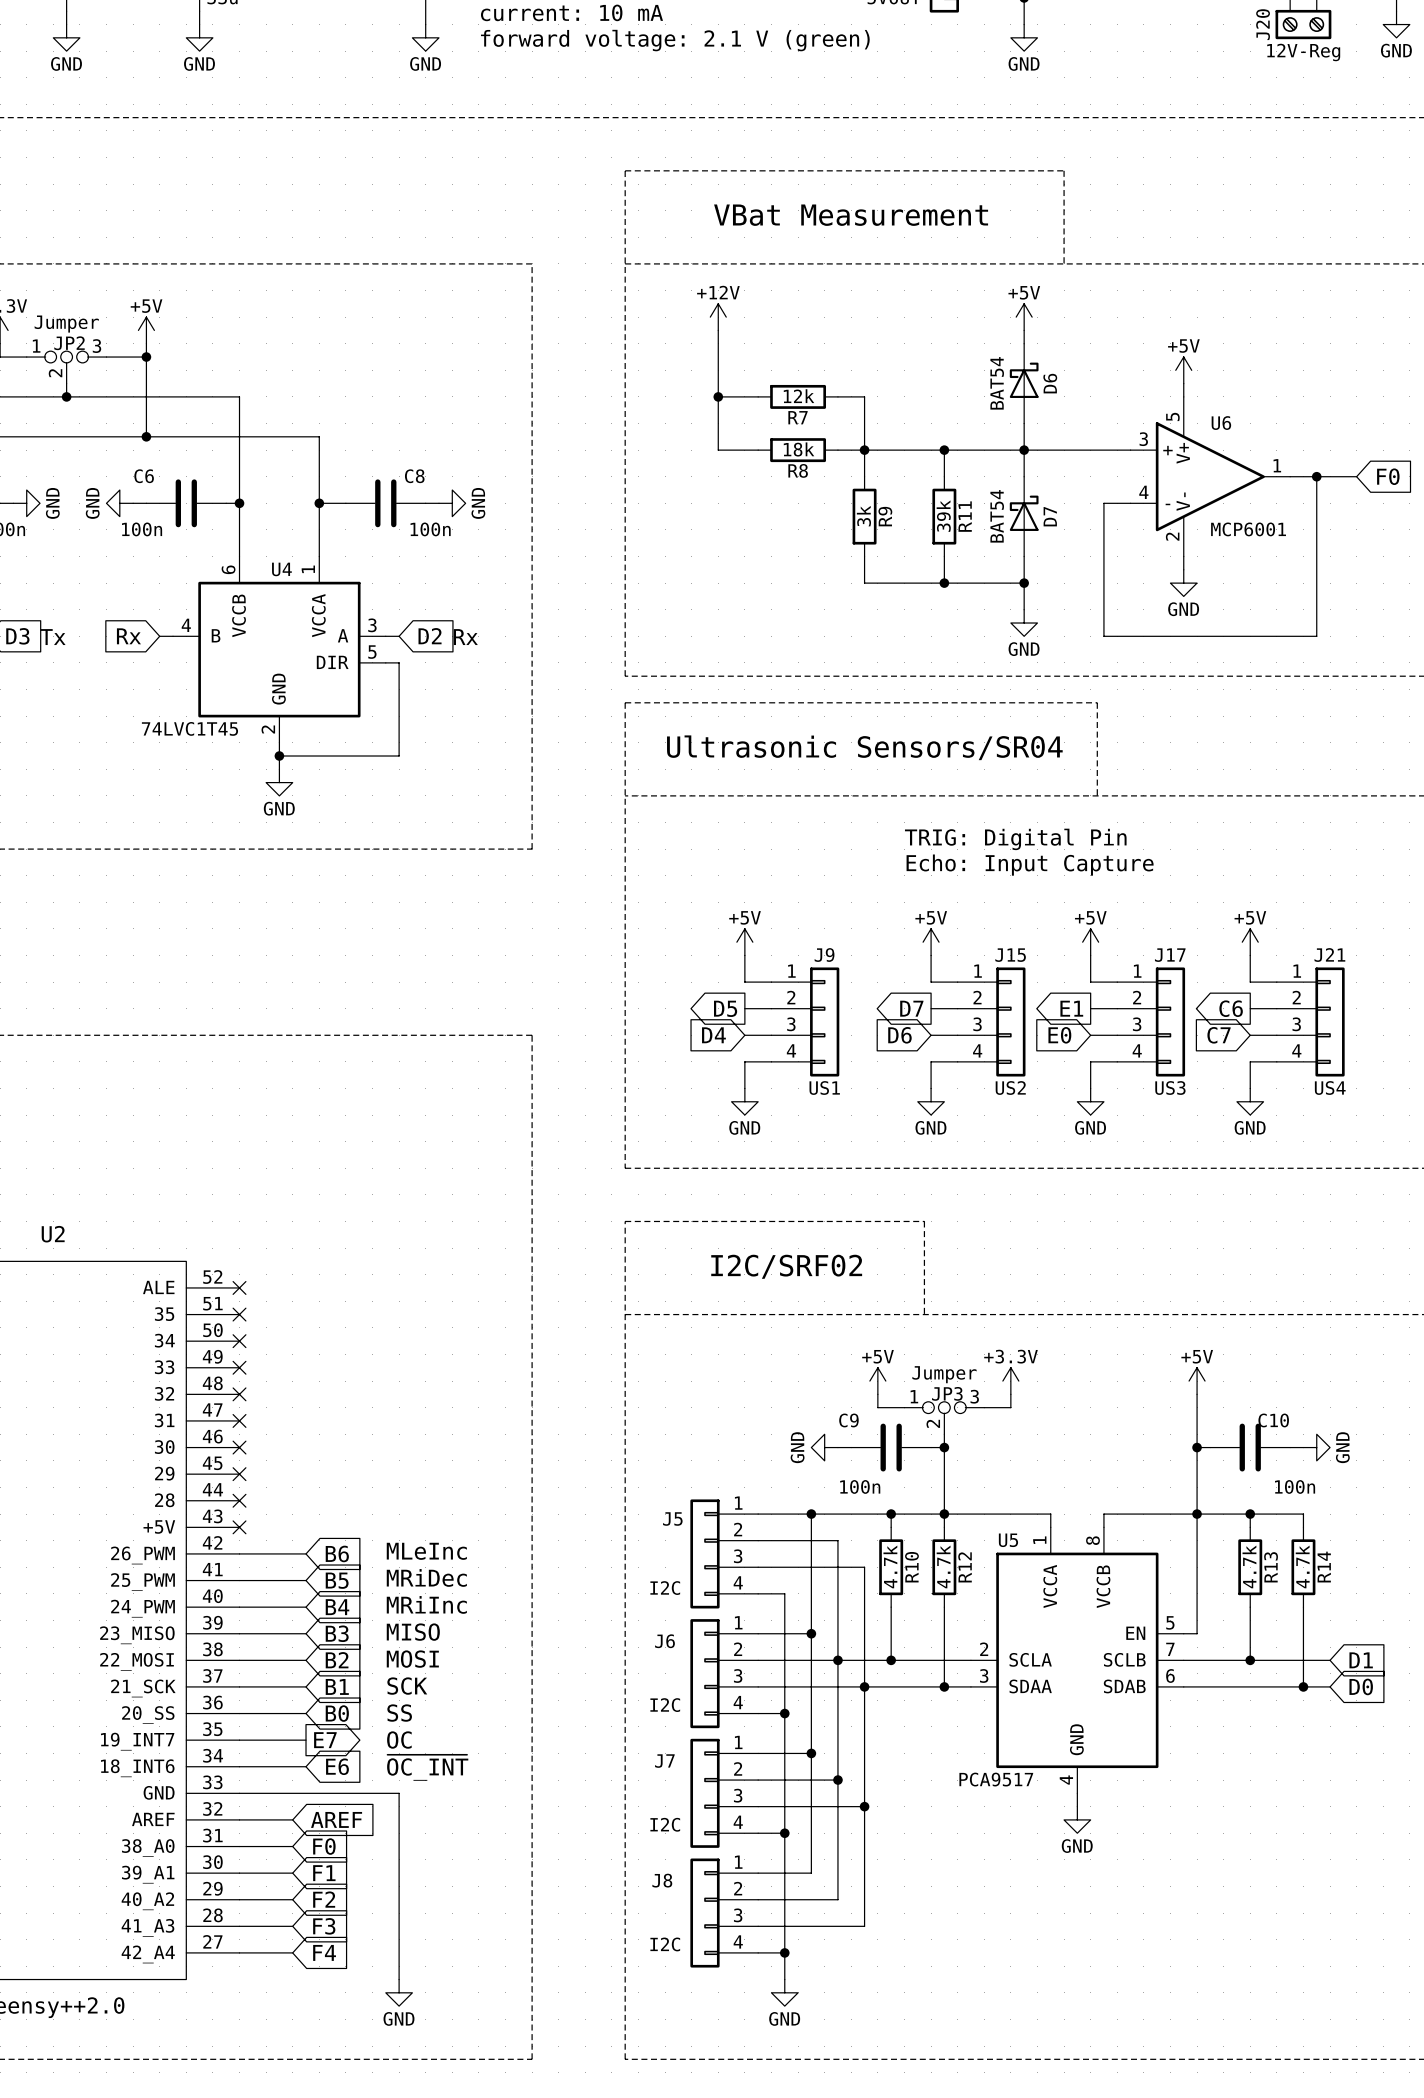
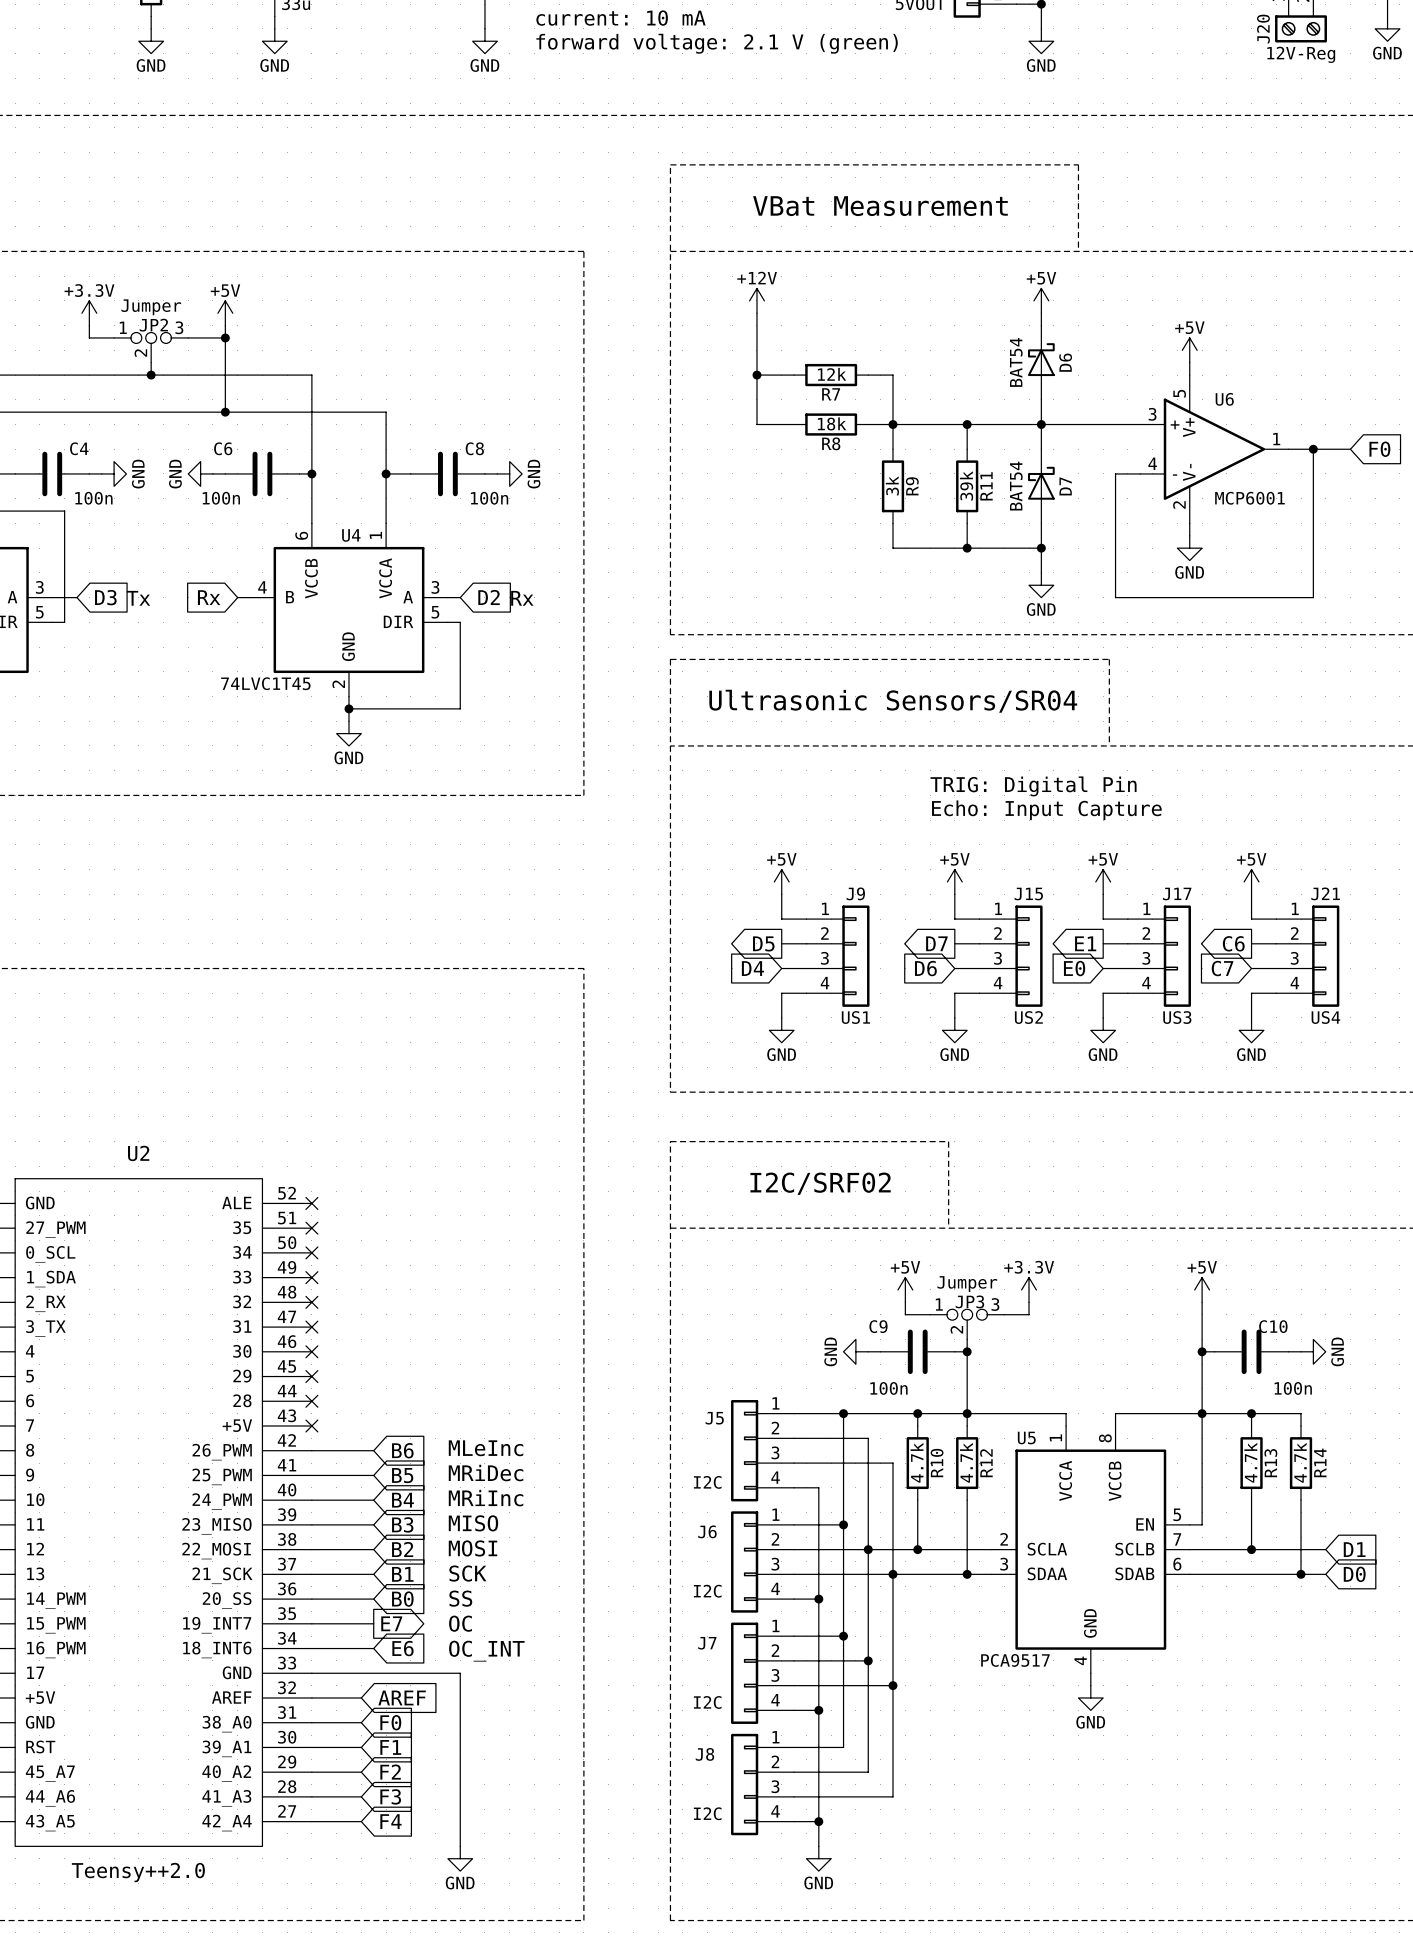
text: ~{OC_INT} (427, 1767) -> OC_INT (486, 1651)

